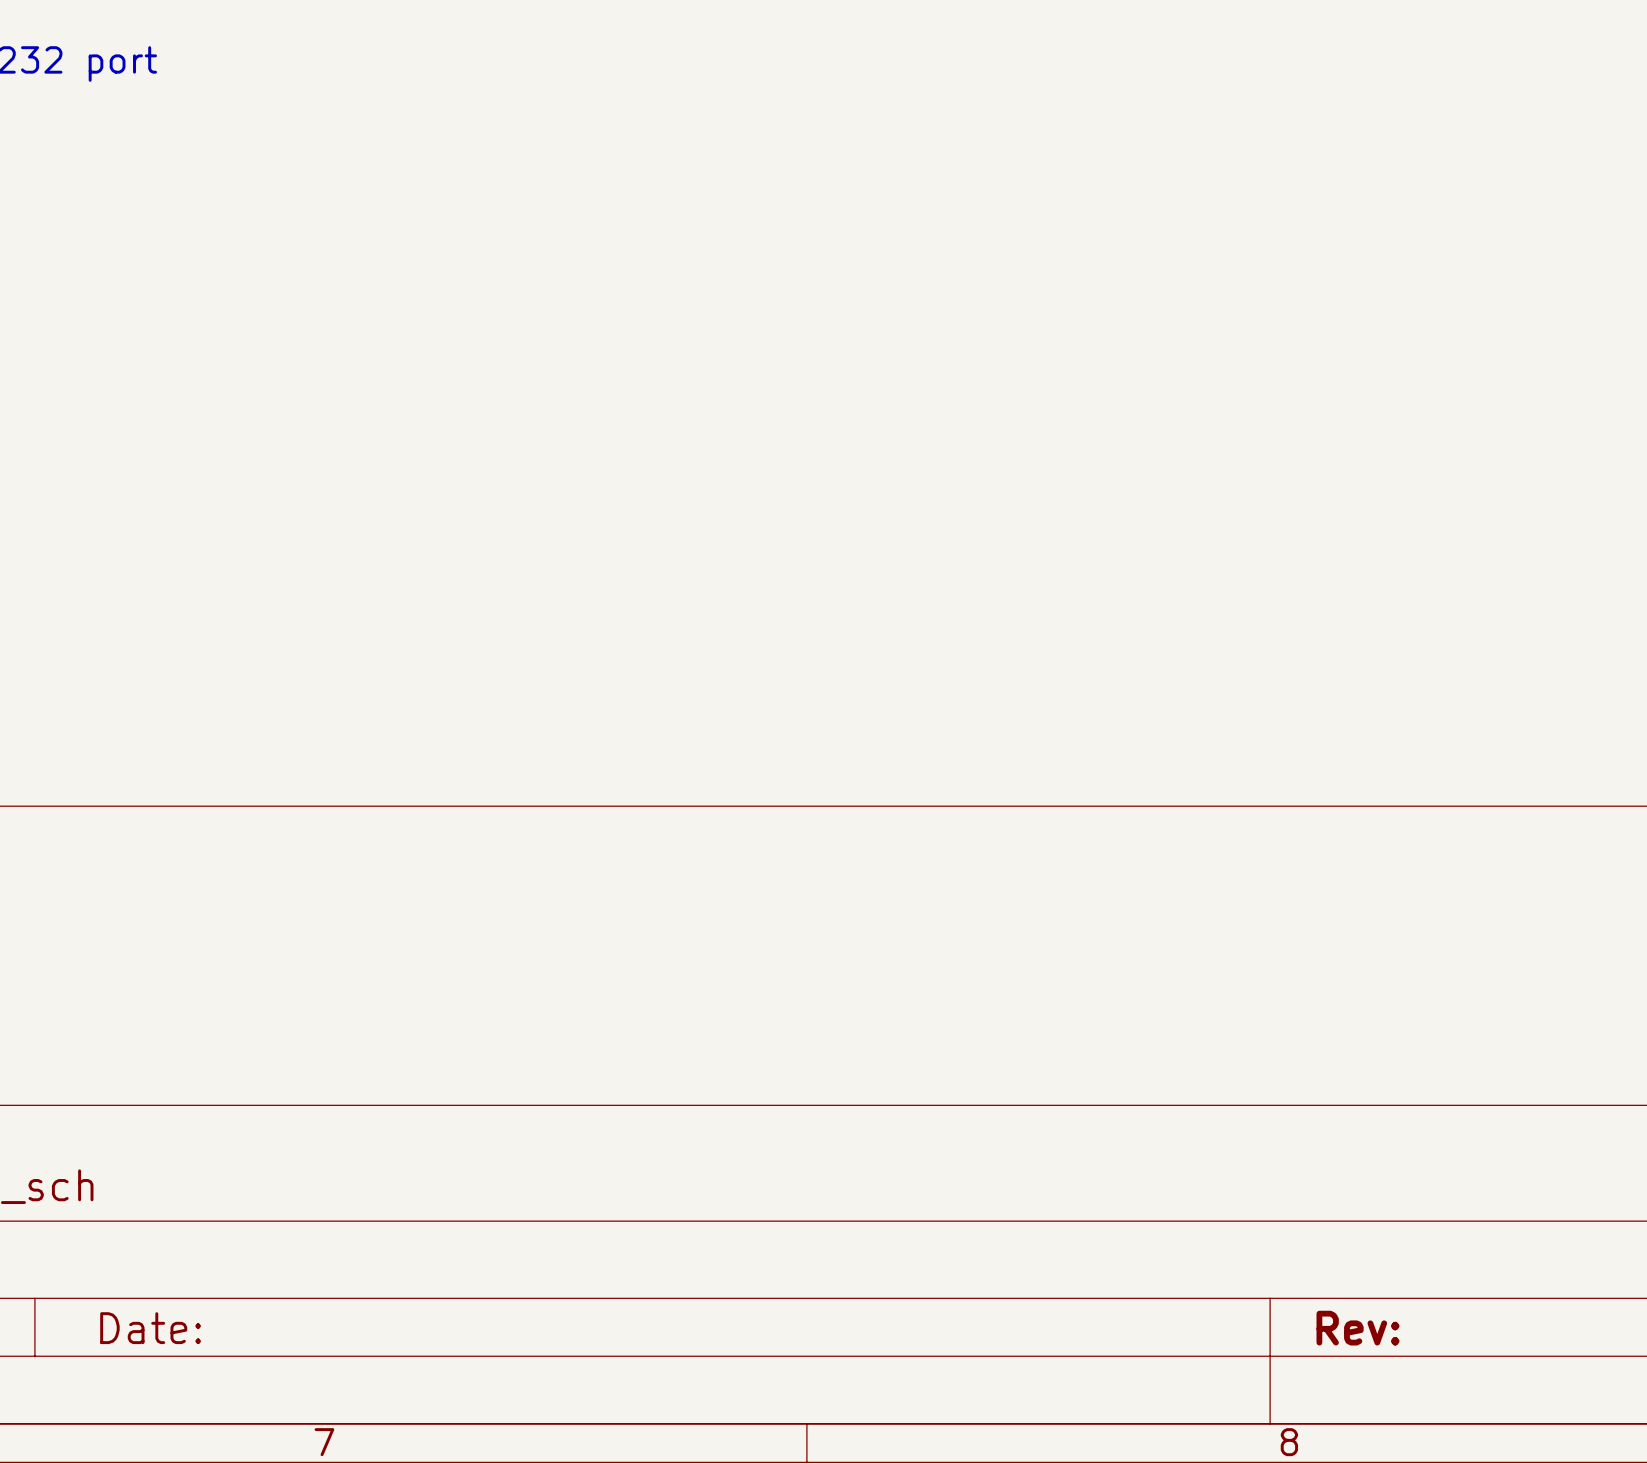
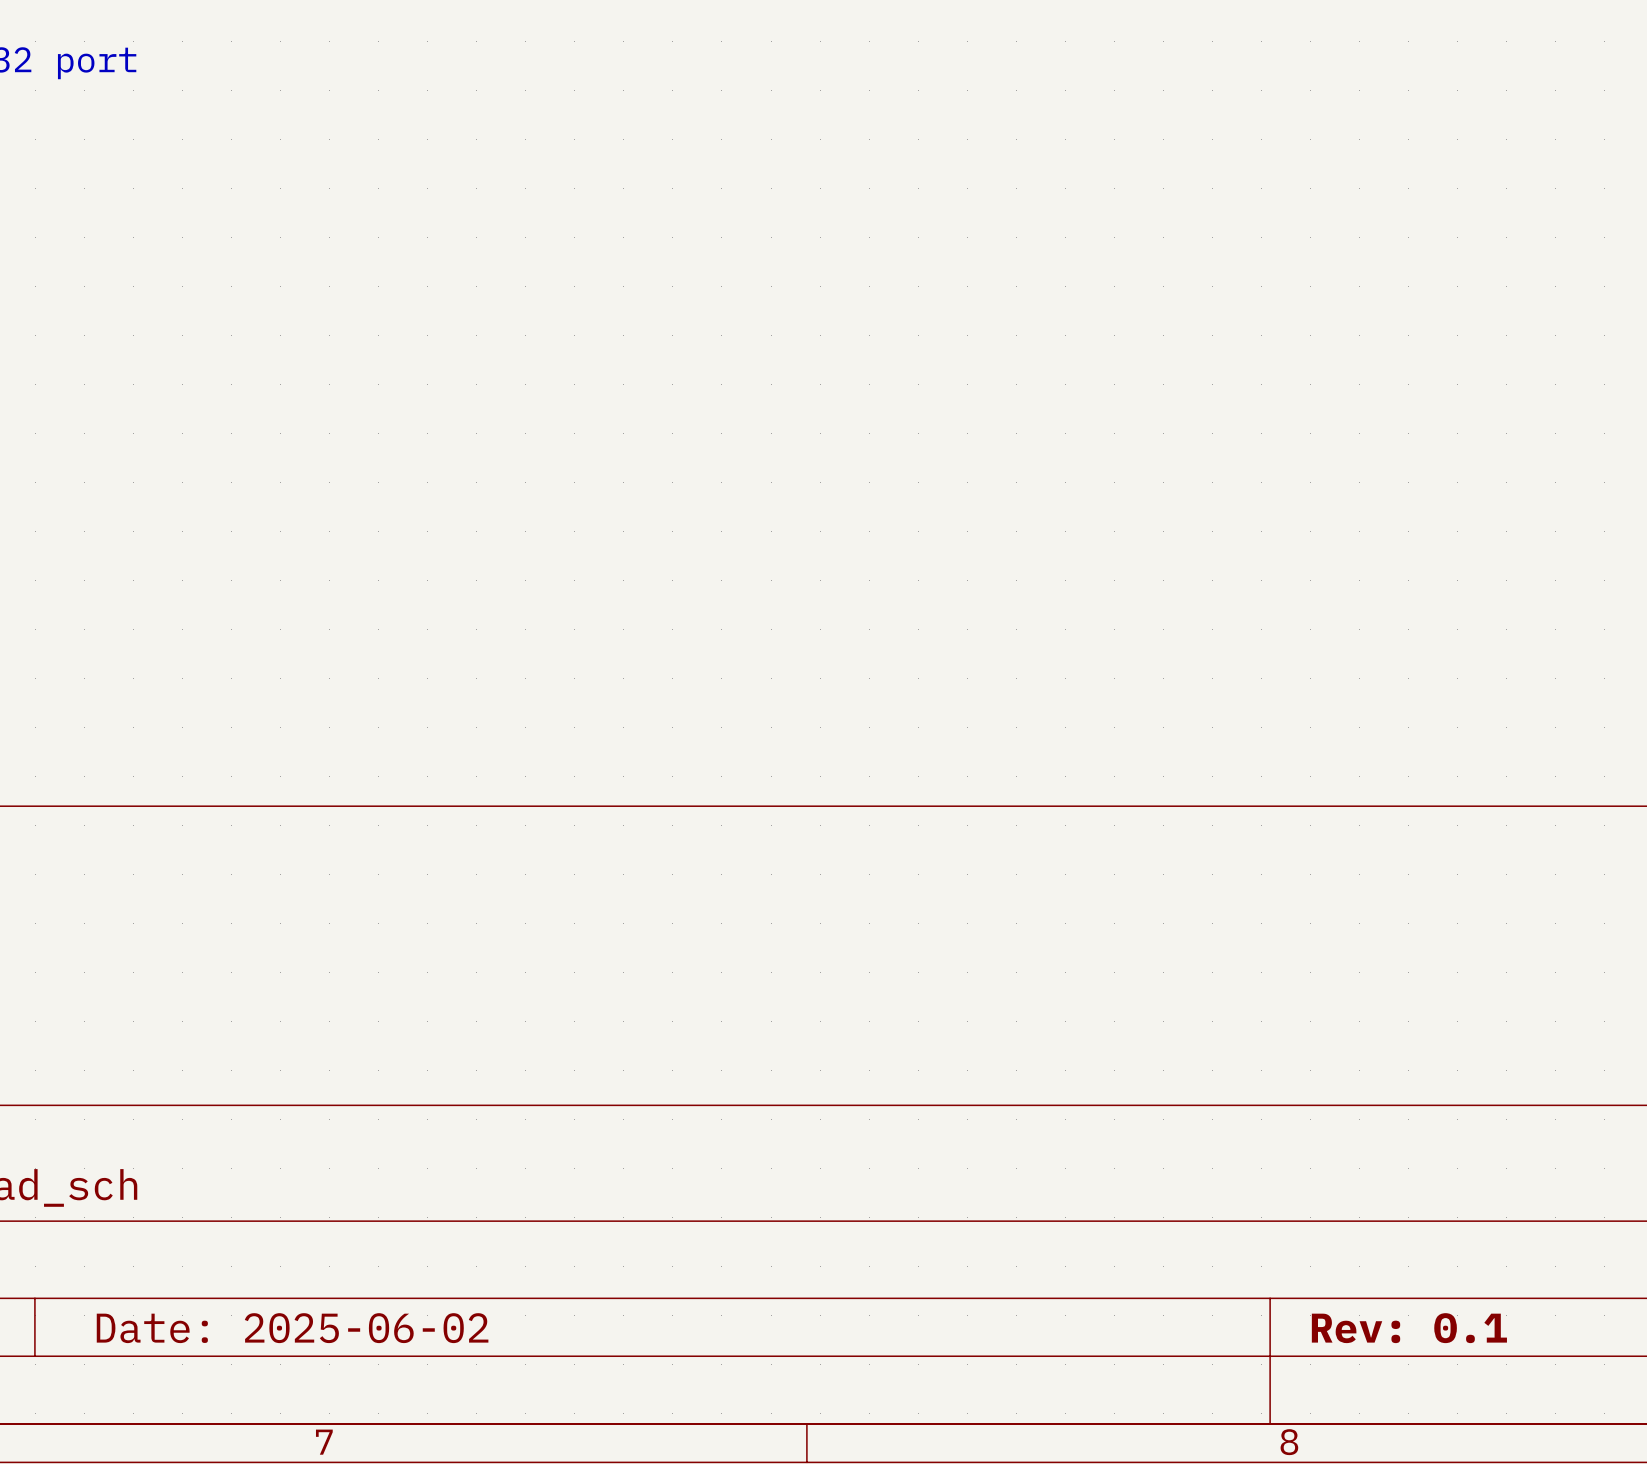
title block: Date: (150, 1328) -> Date: 2025-06-02 (292, 1328)
title block: Rev: (1358, 1328) -> Rev: 0.1 (1409, 1328)

